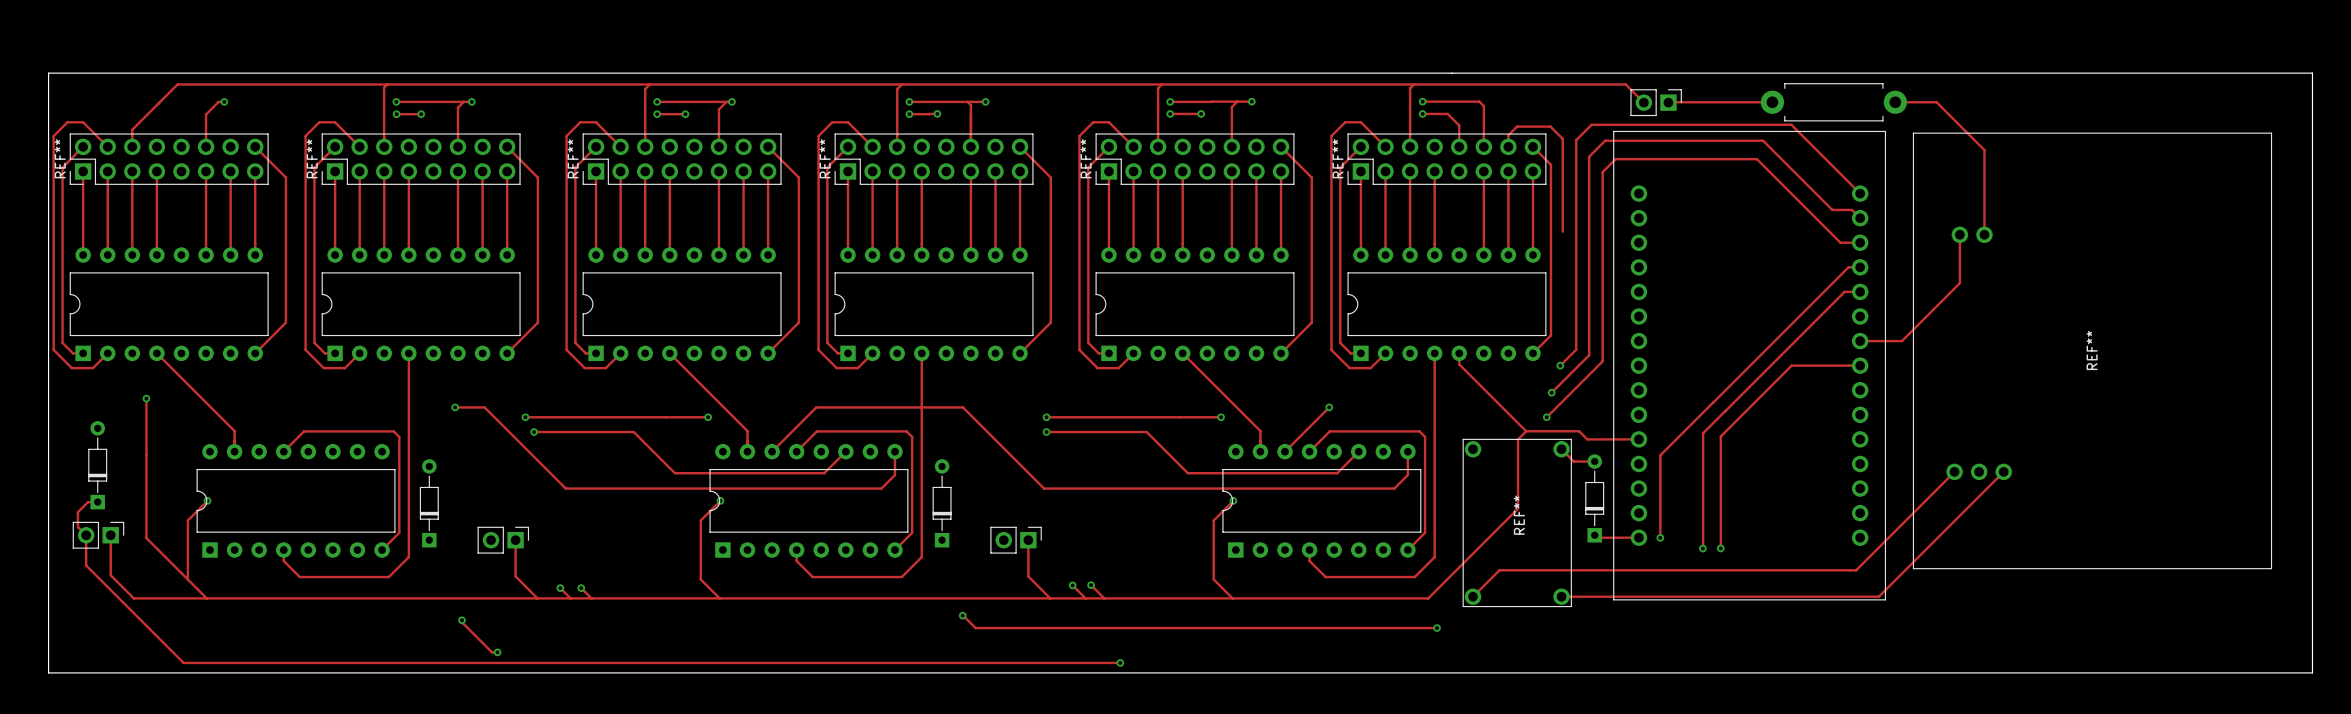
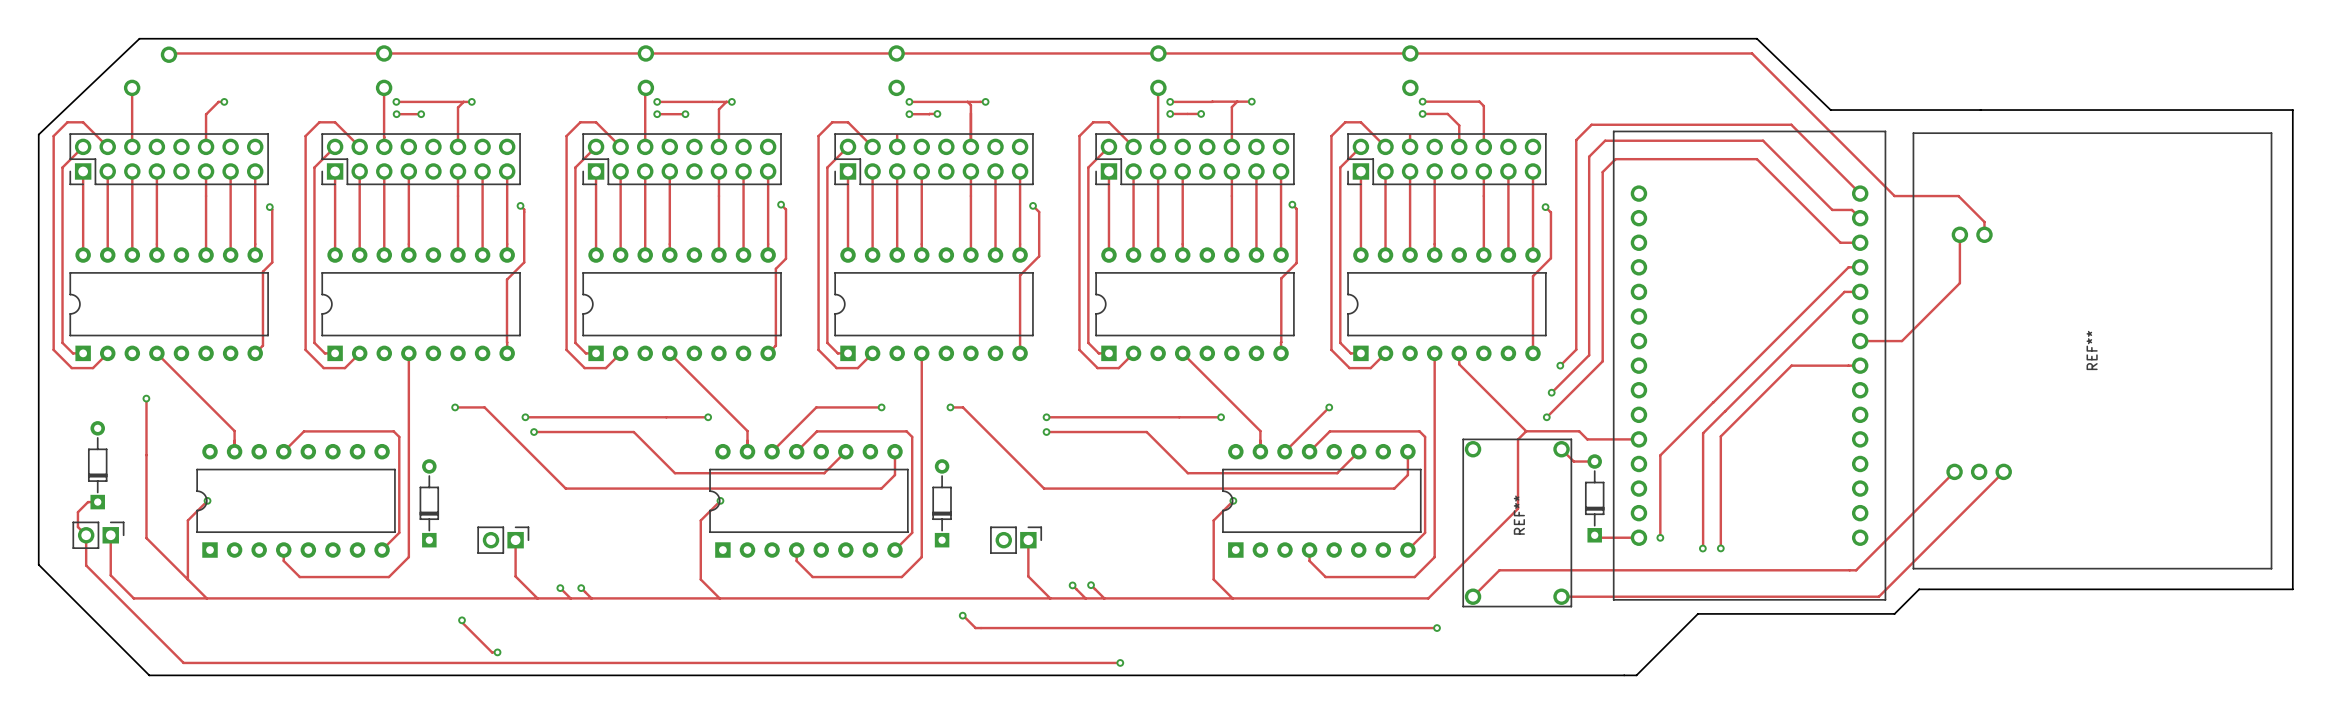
part: none -> (384, 53)
part: none -> (645, 53)
part: none -> (896, 53)
part: none -> (1158, 53)
part: none -> (1410, 53)
part: none -> (169, 54)
board edge: (48, 73) (48, 672) (2312, 672) (2312, 73) (48, 73) -> (139, 38) (38, 134) (38, 564) (149, 675) (1636, 675) (1697, 613) (1894, 613) (1919, 589) (2292, 589) (2292, 110) (1830, 110) (1756, 38) (139, 38)
track: (902, 84) (897, 89) (897, 135) -> none
track: (1414, 84) (1410, 88) (1410, 135) -> none
part: none -> (132, 87)
part: none -> (384, 87)
part: none -> (645, 87)
part: none -> (896, 87)
part: none -> (1158, 87)
part: none -> (1410, 87)
track: (1643, 102) (1625, 84) (177, 84) (132, 129) (132, 146) -> (131, 88) (132, 146)
part: (1656, 102) -> none
track: (1772, 102) (1668, 102) -> none
part: (1833, 102) -> none
track: (1895, 102) (1936, 102) (1984, 150) (1984, 222) -> (169, 54) (1752, 53) (1894, 196) (1958, 196) (1984, 222)
track: (255, 146) (285, 177) (285, 322) (262, 345) -> (269, 207) (272, 209) (272, 262) (262, 271) (262, 345)
track: (507, 146) (537, 177) (537, 322) (507, 353) -> (520, 205) (524, 209) (524, 262) (507, 279) (507, 353)
track: (768, 146) (798, 177) (798, 322) (775, 345) -> (781, 204) (785, 209) (785, 258) (775, 268) (775, 345)
track: (1020, 146) (1050, 177) (1050, 322) (1020, 353) -> (1033, 205) (1039, 212) (1039, 256) (1020, 275) (1020, 353)
track: (1281, 146) (1311, 177) (1311, 322) (1281, 353) -> (1292, 204) (1296, 208) (1296, 263) (1281, 278) (1281, 353)
track: (1508, 146) (1508, 135) (1517, 126) (1550, 126) (1562, 138) (1562, 231) -> none
track: (1532, 146) (1550, 164) (1550, 212) -> (1545, 207) (1550, 212)
REF** name: REF** (60, 158) -> none
REF** name: REF** (312, 158) -> none
REF** name: REF** (573, 158) -> none
REF** name: REF** (825, 158) -> none
REF** name: REF** (1086, 158) -> none
REF** name: REF** (1338, 158) -> none
via: none -> (781, 204)
via: none -> (1292, 204)
via: none -> (520, 205)
via: none -> (1033, 205)
via: none -> (269, 207)
via: none -> (1545, 207)
track: (1550, 258) (1550, 335) (1532, 353) -> (1550, 258) (1532, 276) (1532, 353)
track: (881, 407) (950, 407) -> none
via: none -> (881, 407)
via: none -> (950, 407)

